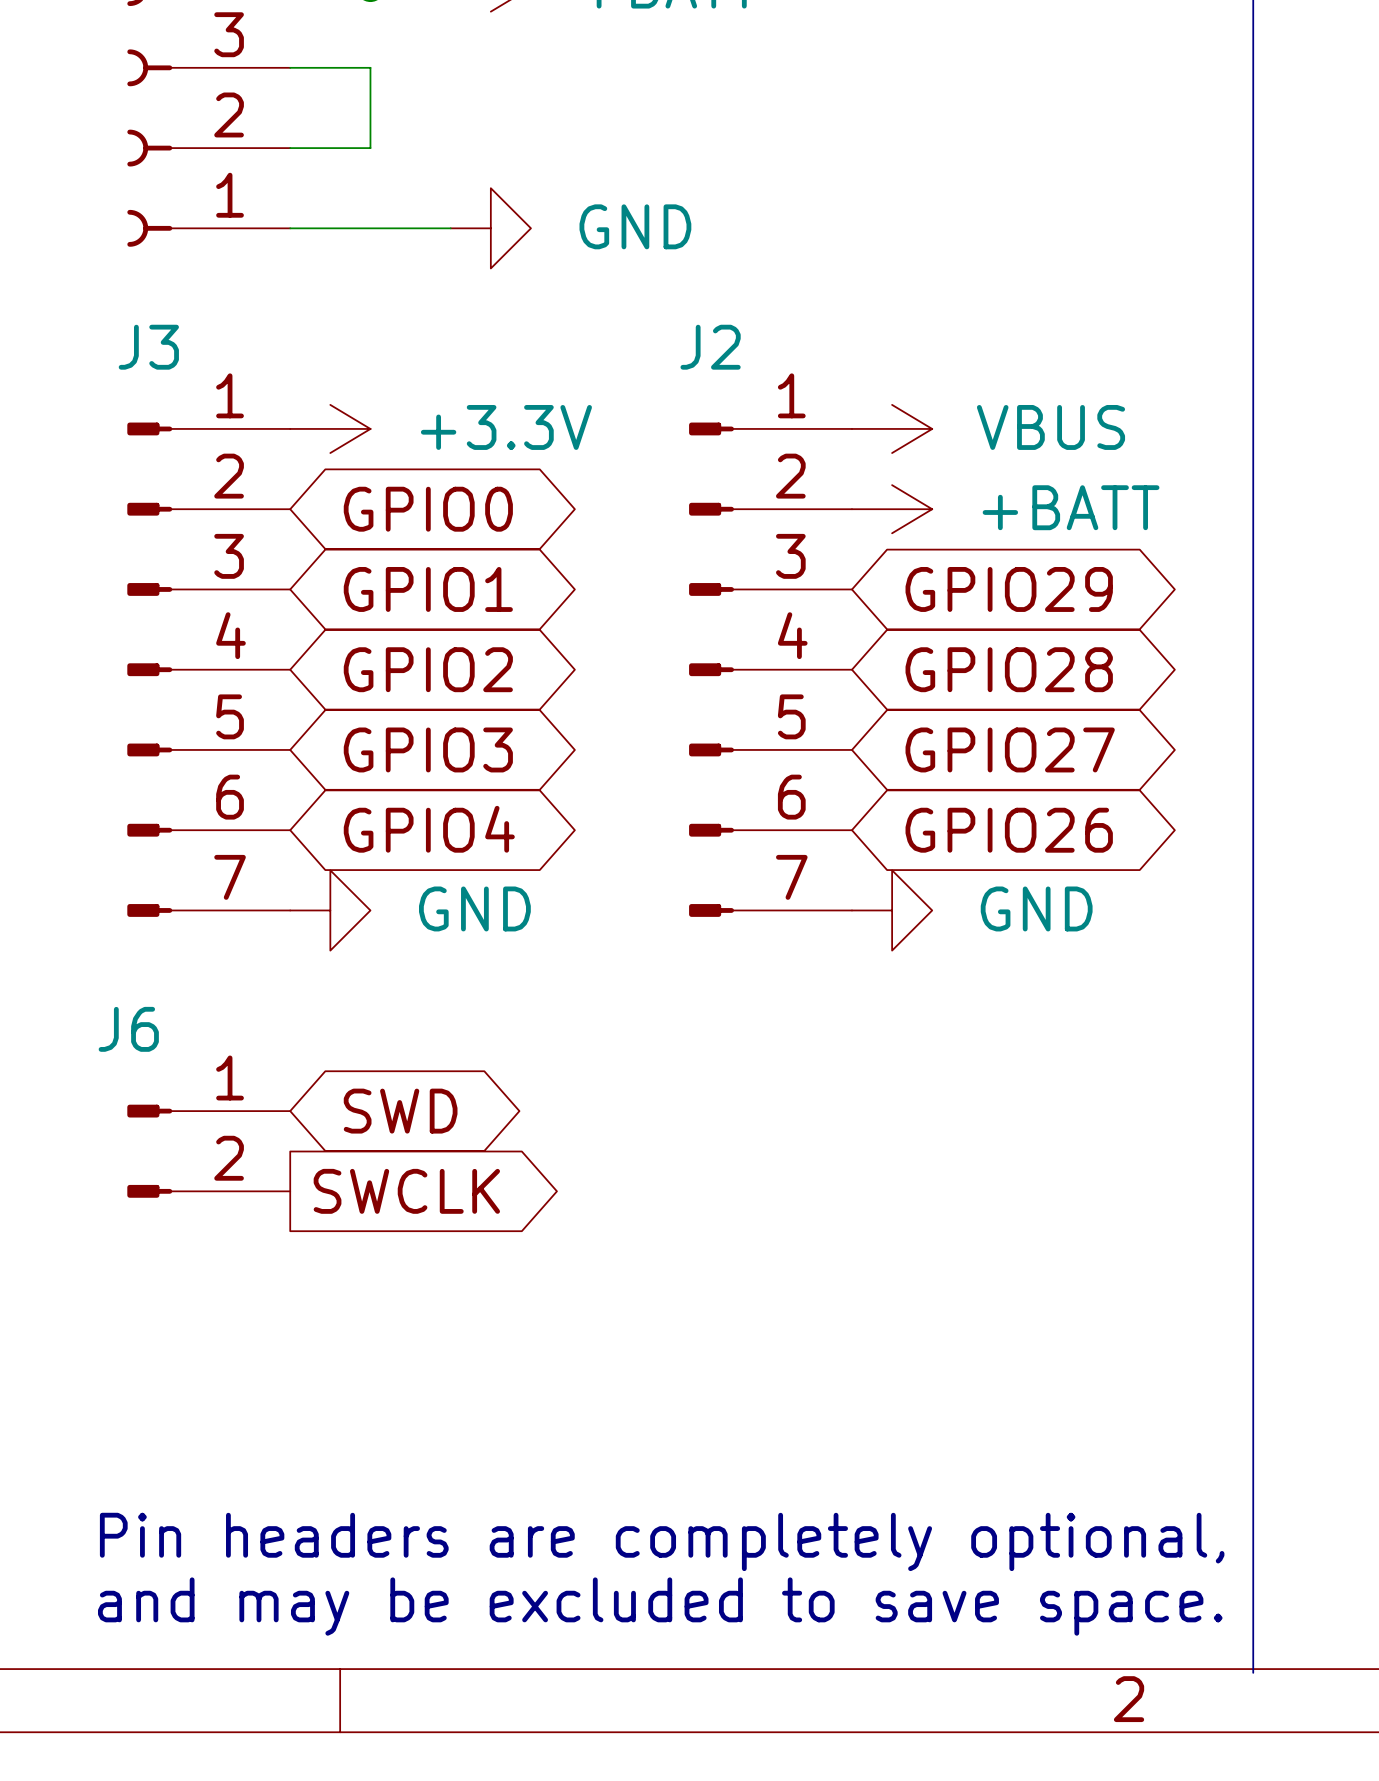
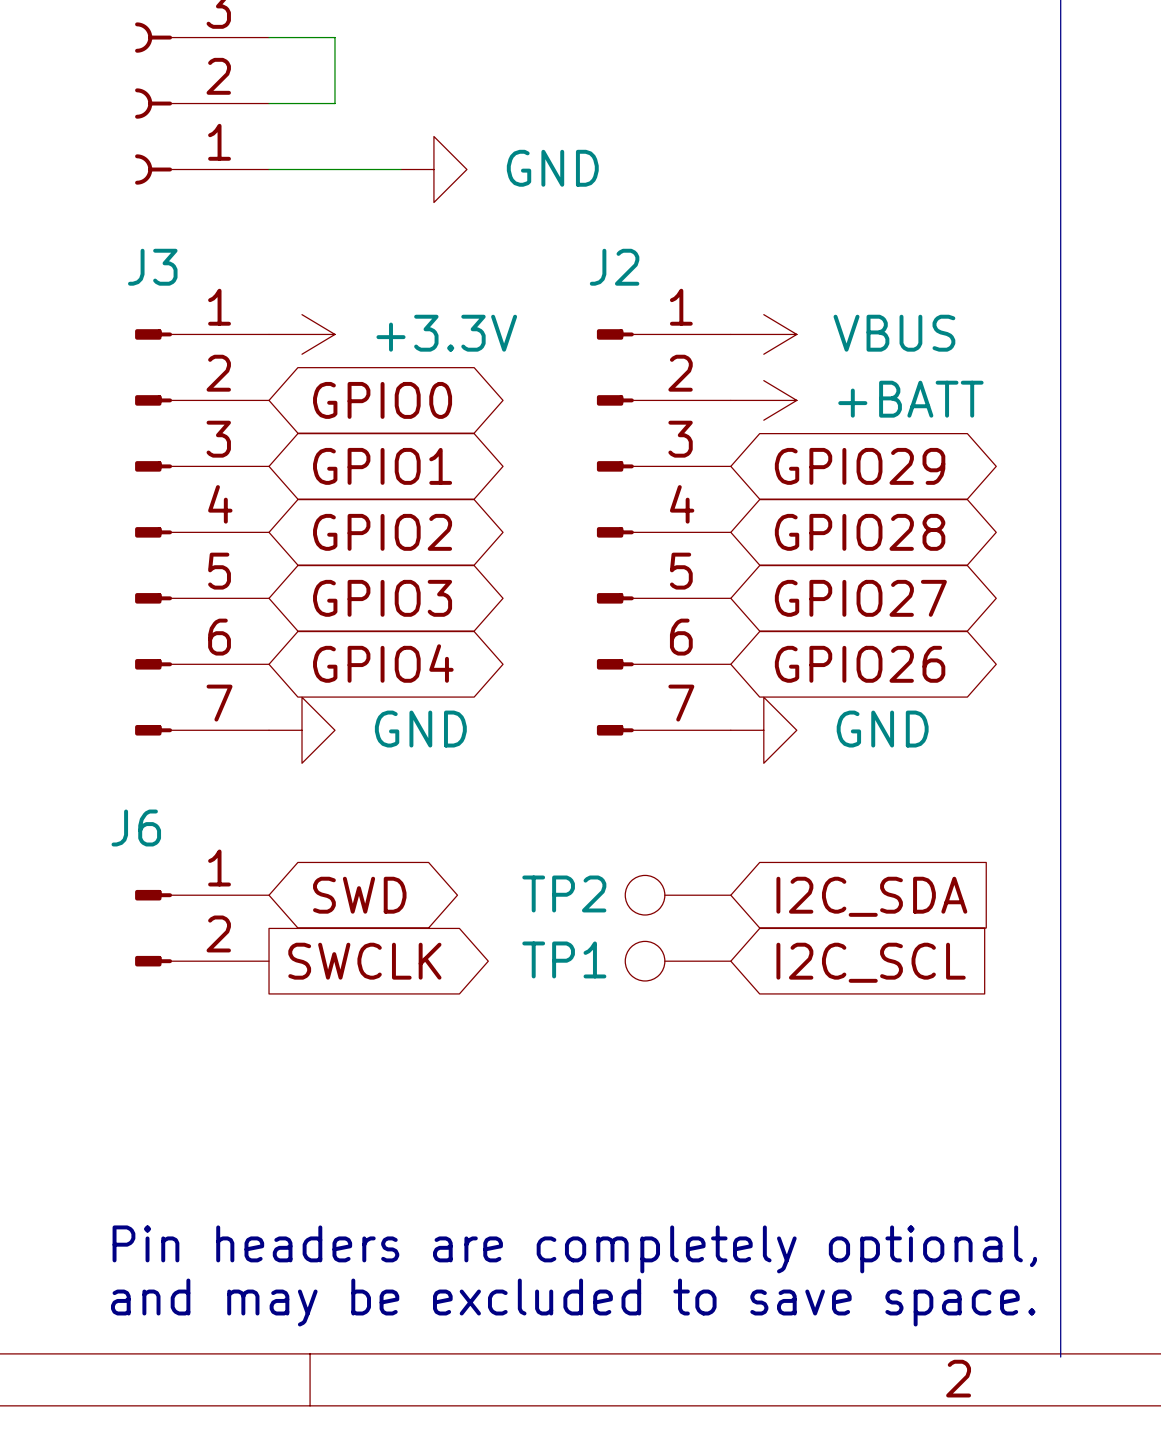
TP2: none -> (678, 895)
global label: none -> I2C_SDA (871, 896)
TP1: none -> (678, 961)
global label: none -> I2C_SCL (871, 962)

